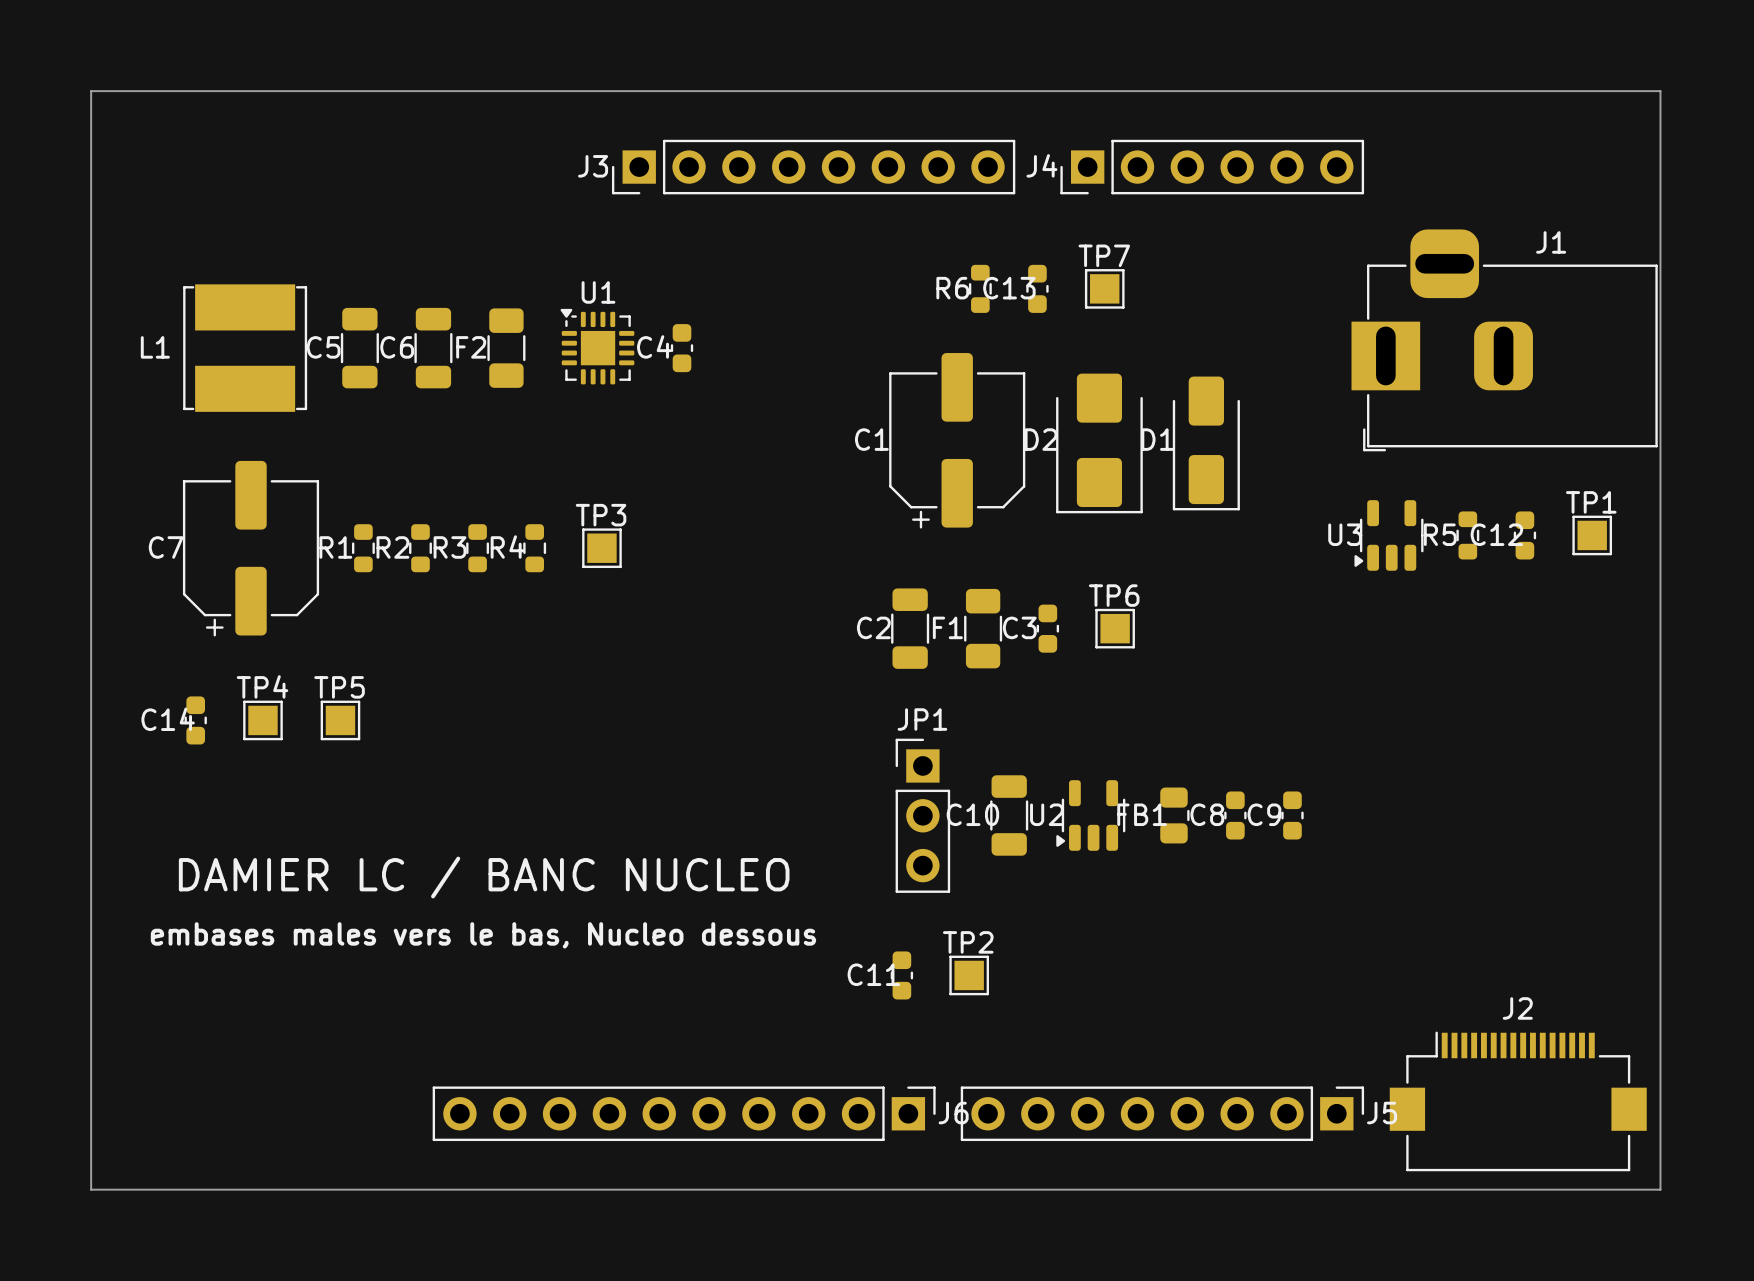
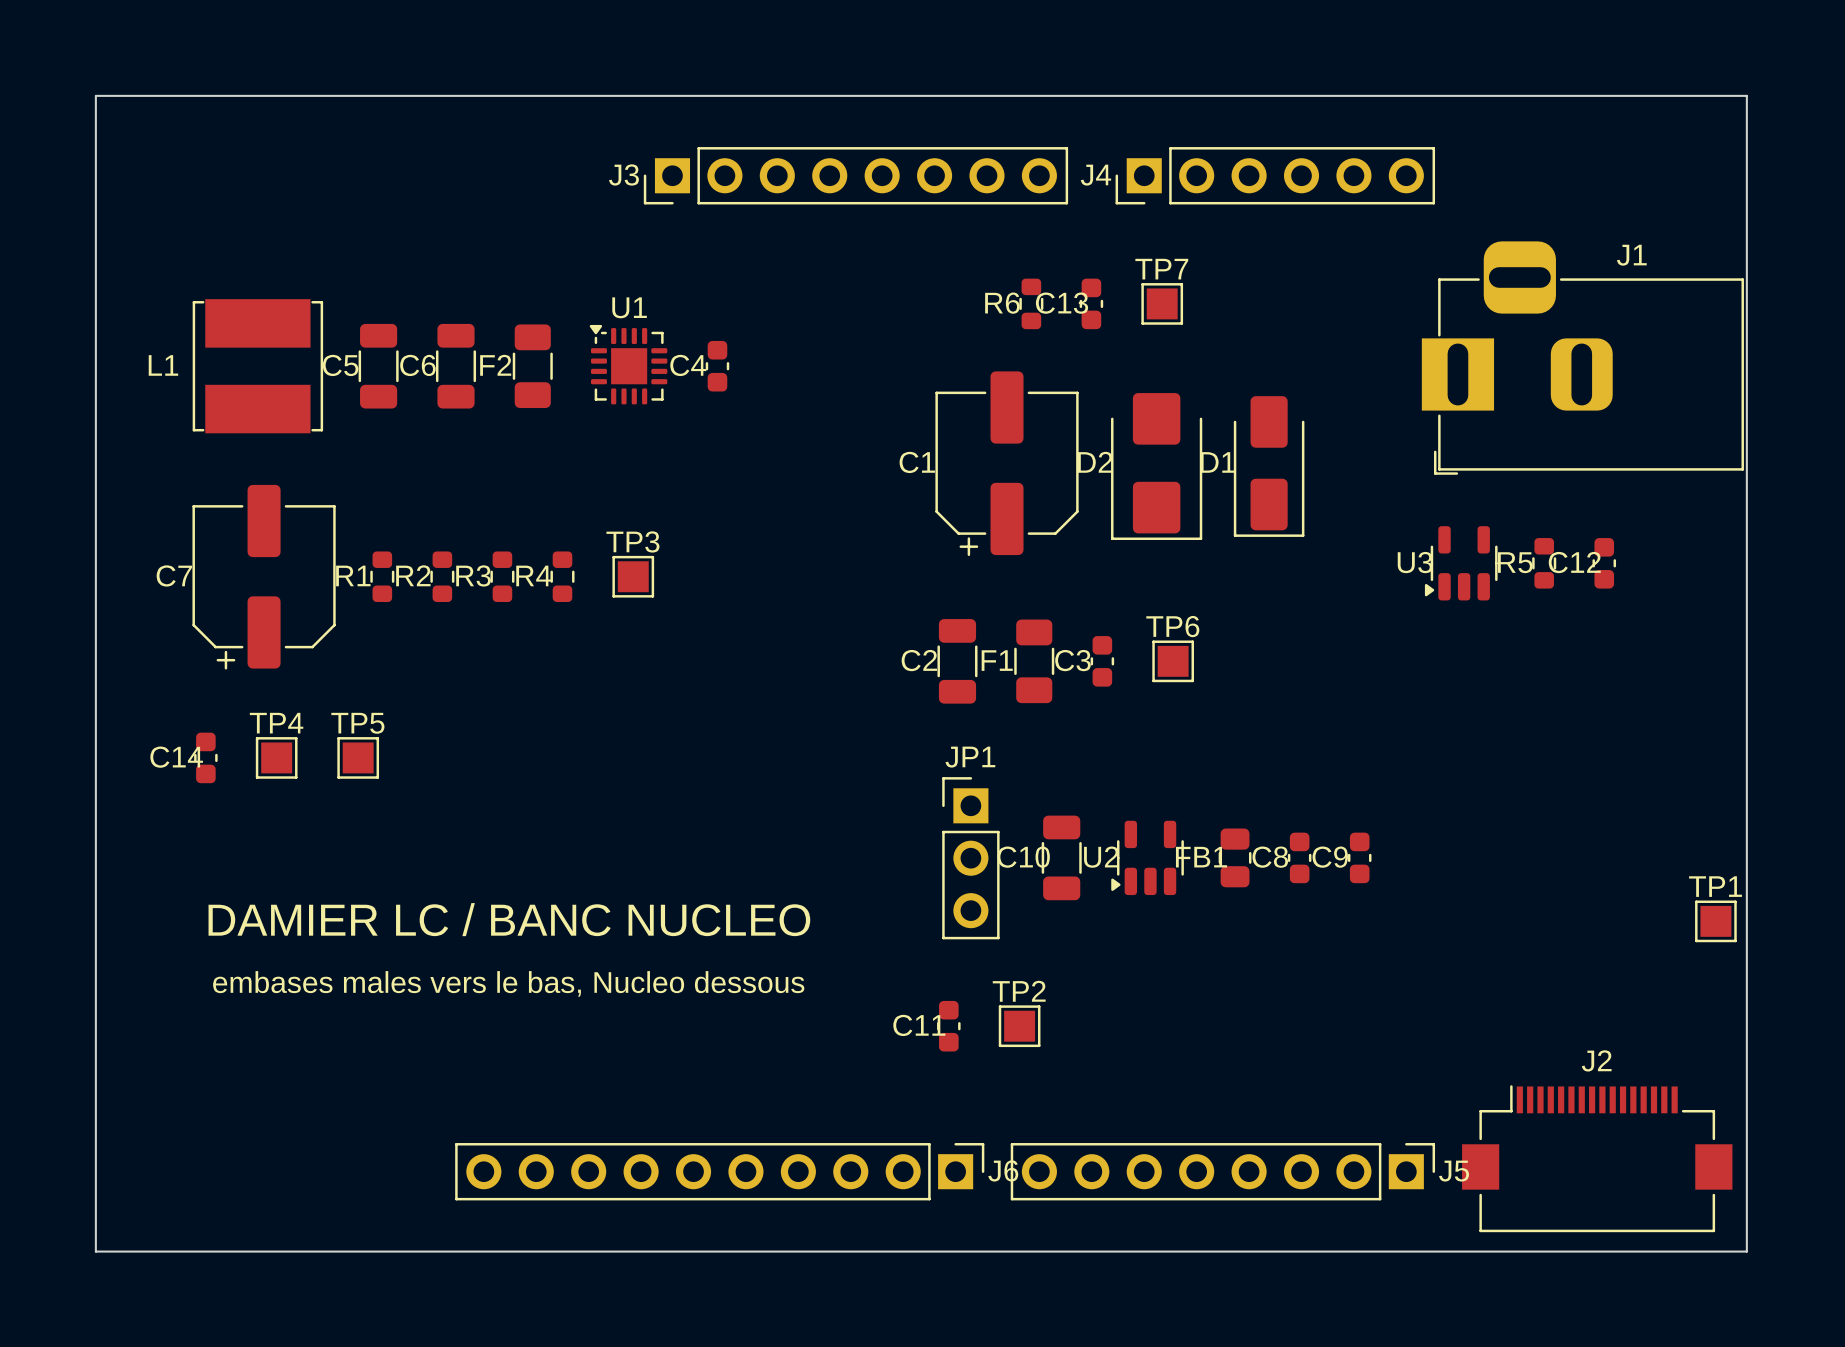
TP1 position: (1592, 535) -> (1715, 921)

